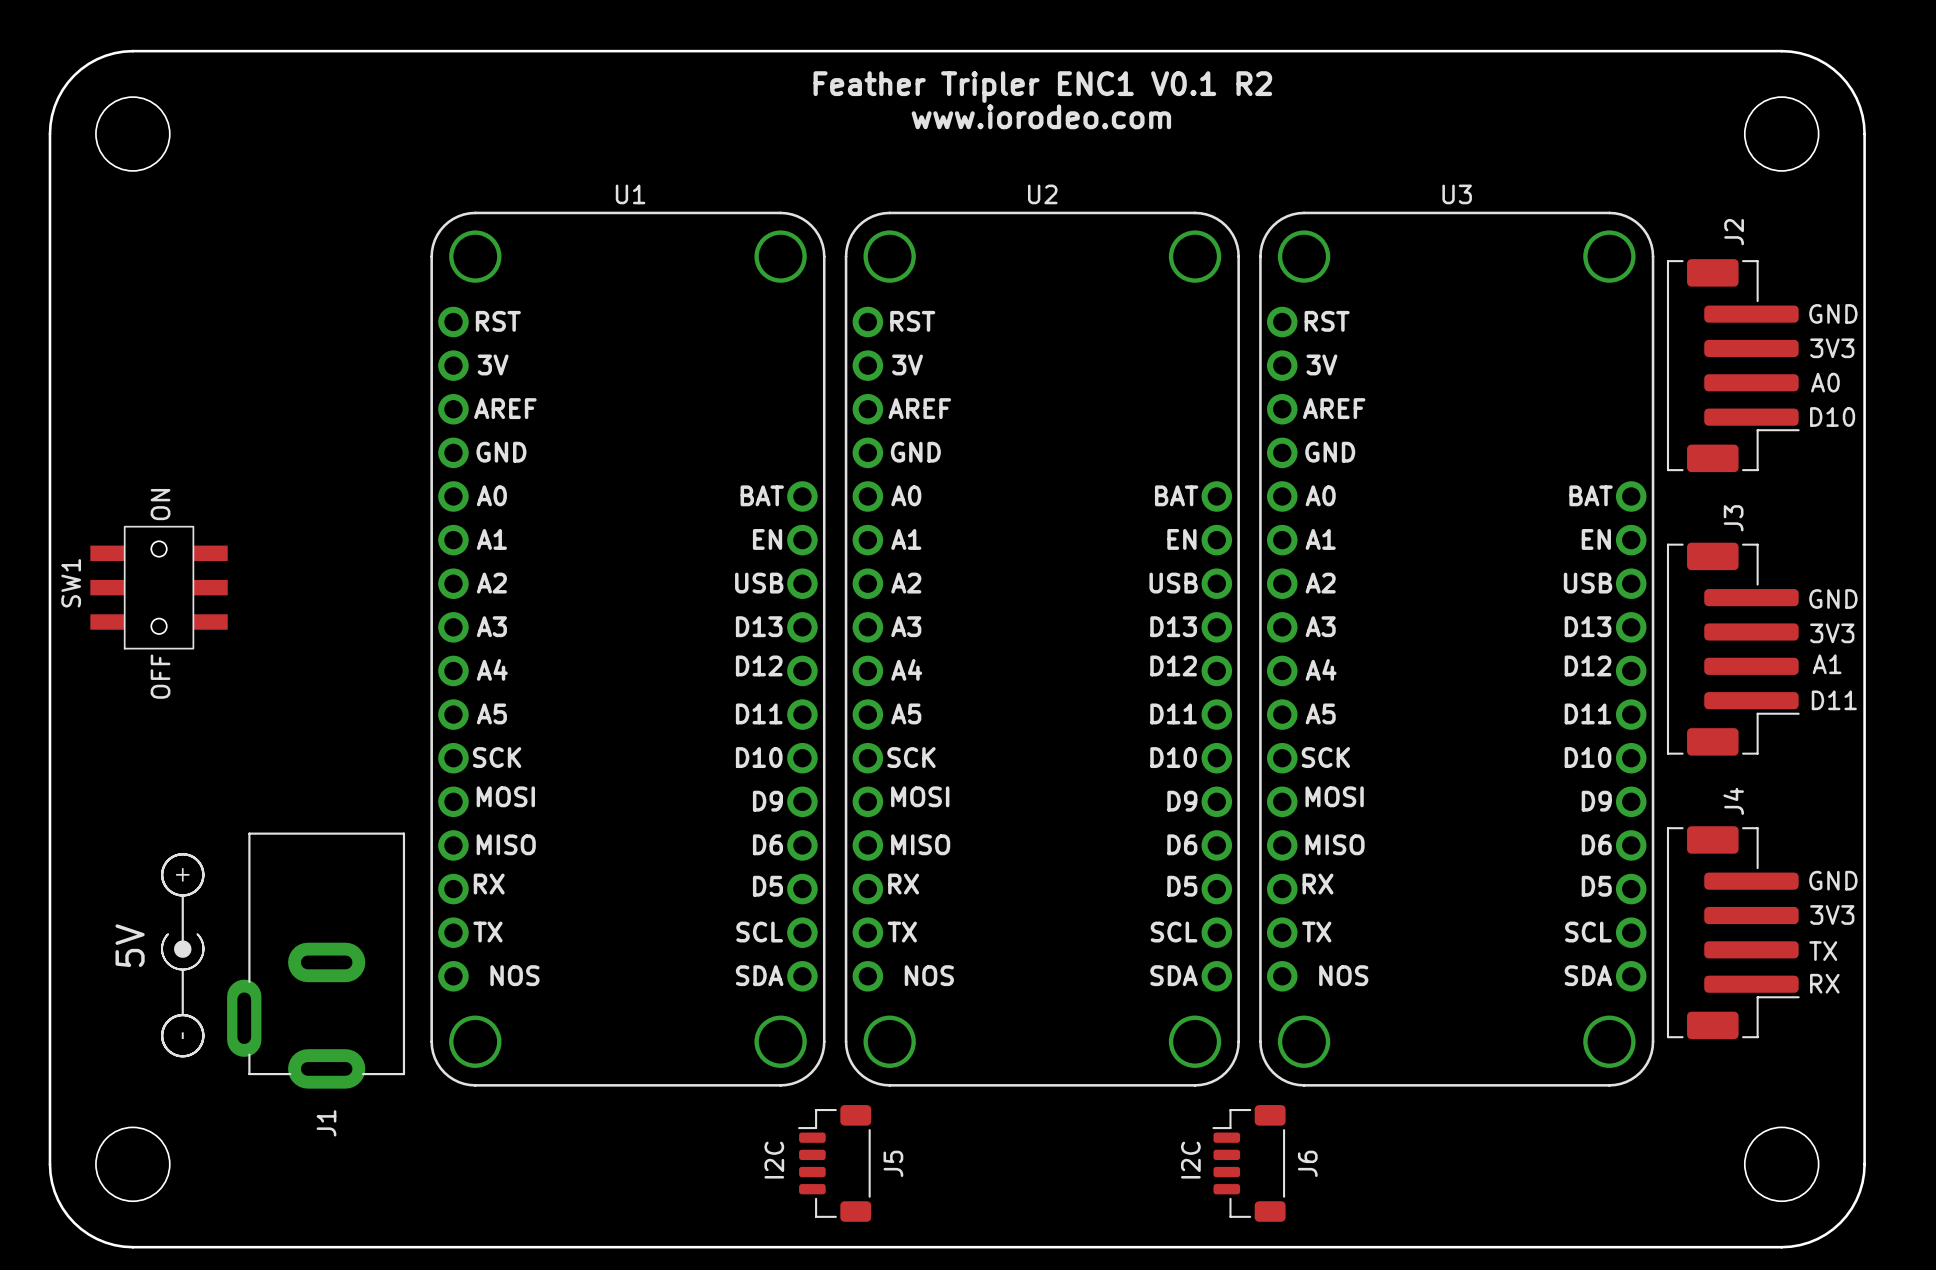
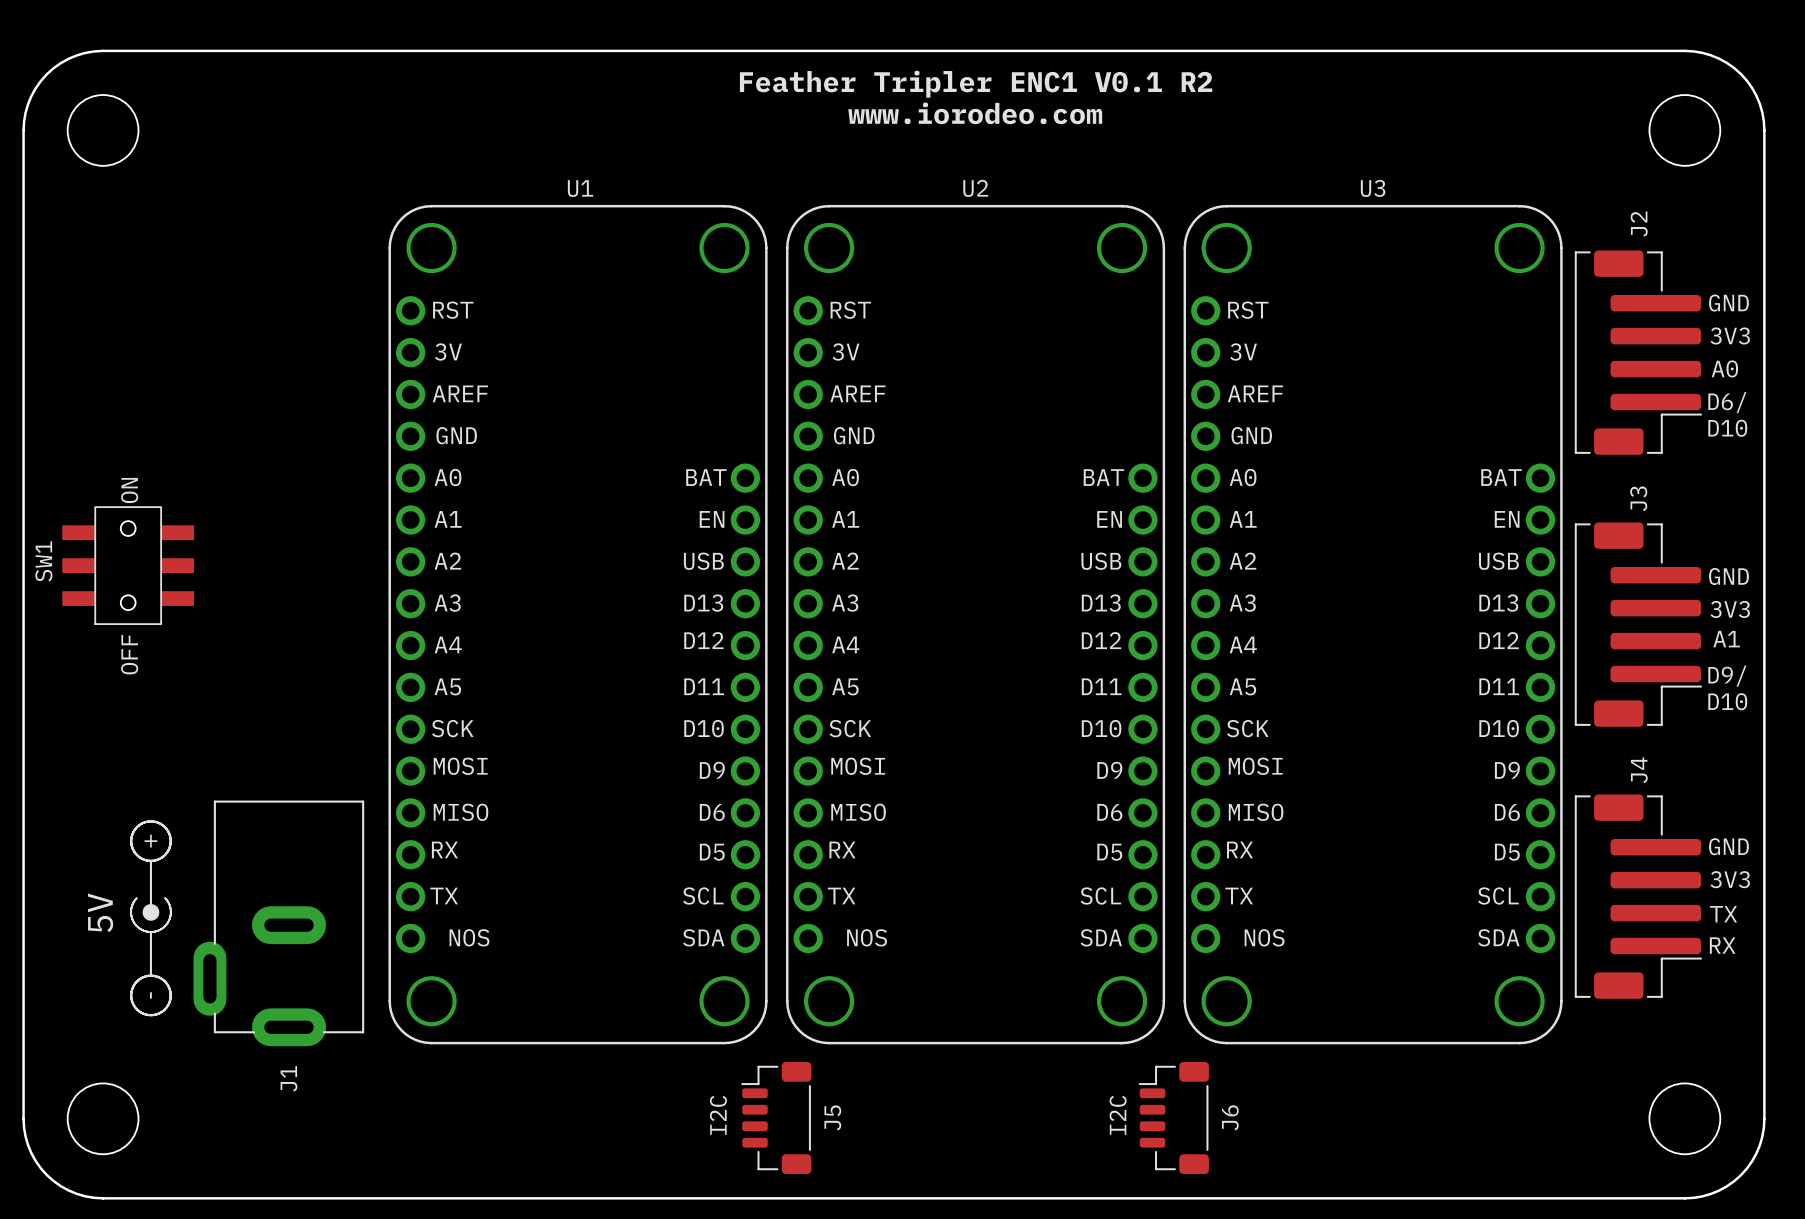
text: D10 (1832, 416) -> D6/ (1727, 402)
text: none -> D10 (1727, 428)
text: D11 (1834, 700) -> D9/ (1727, 676)
text: none -> D10 (1727, 701)

